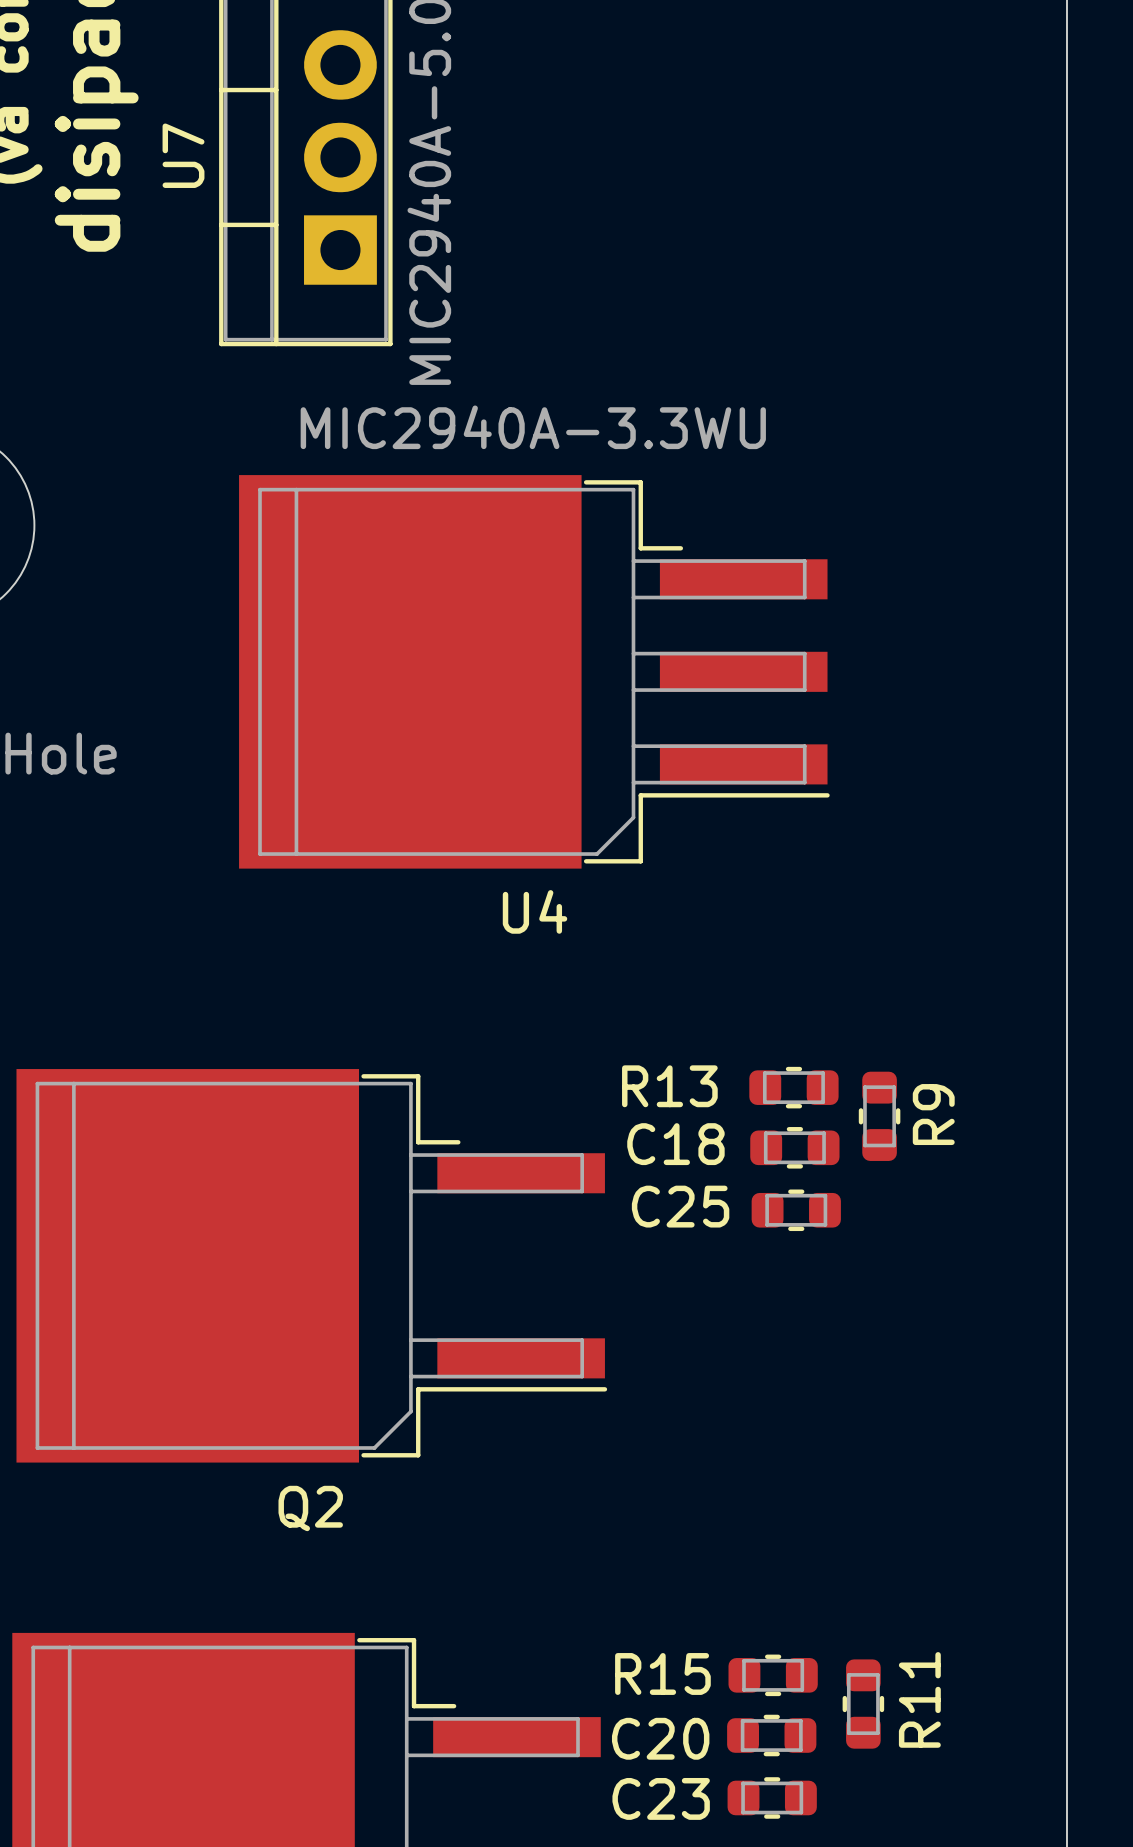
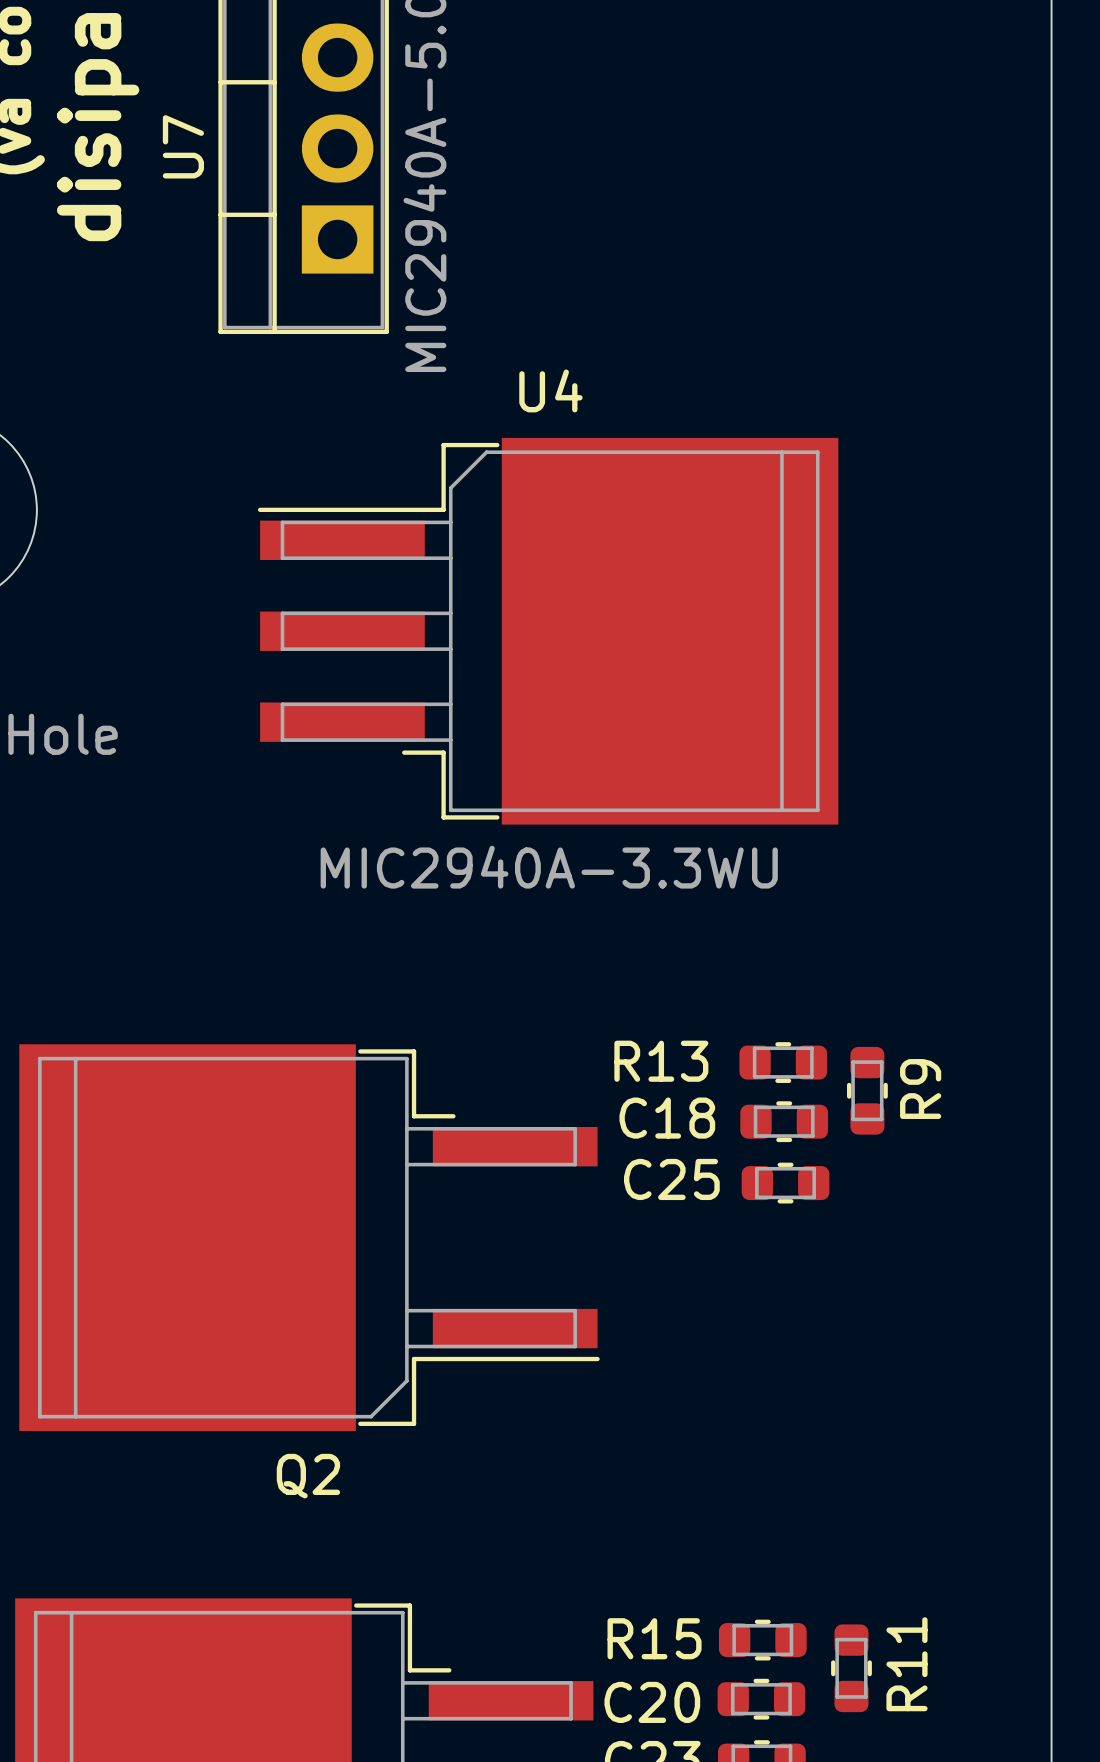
U4 rotation: 0° (534, 671) -> 180° (548, 631)

